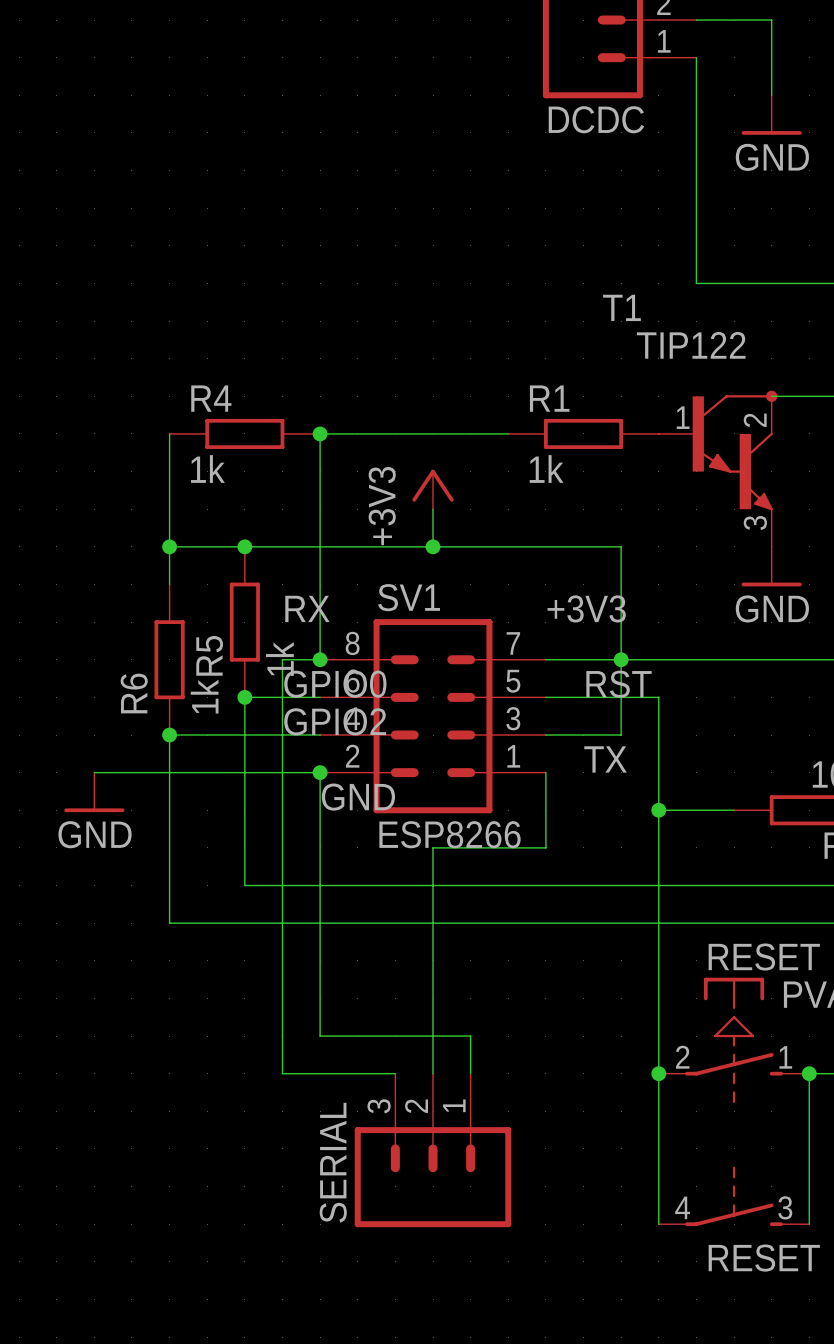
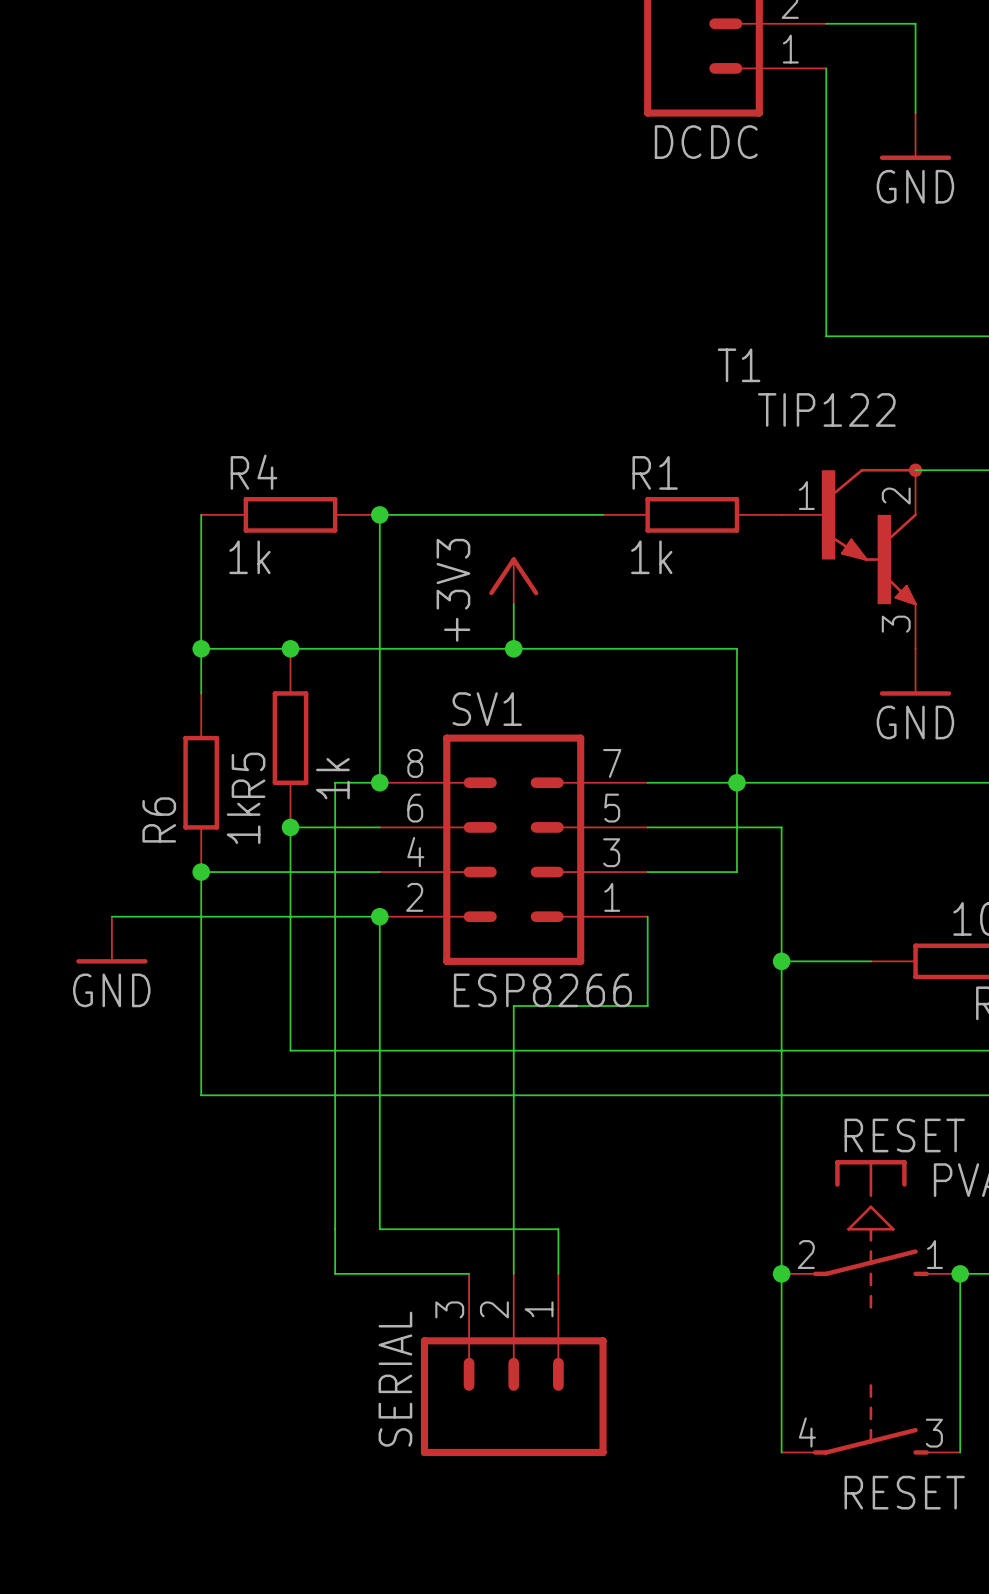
label: RX (307, 608) -> none
label: +3V3 (586, 608) -> none
label: GPIO0 (335, 684) -> none
label: RST (619, 684) -> none
label: GPIO2 (335, 721) -> none
label: TX (605, 759) -> none
label: GND (358, 797) -> none

